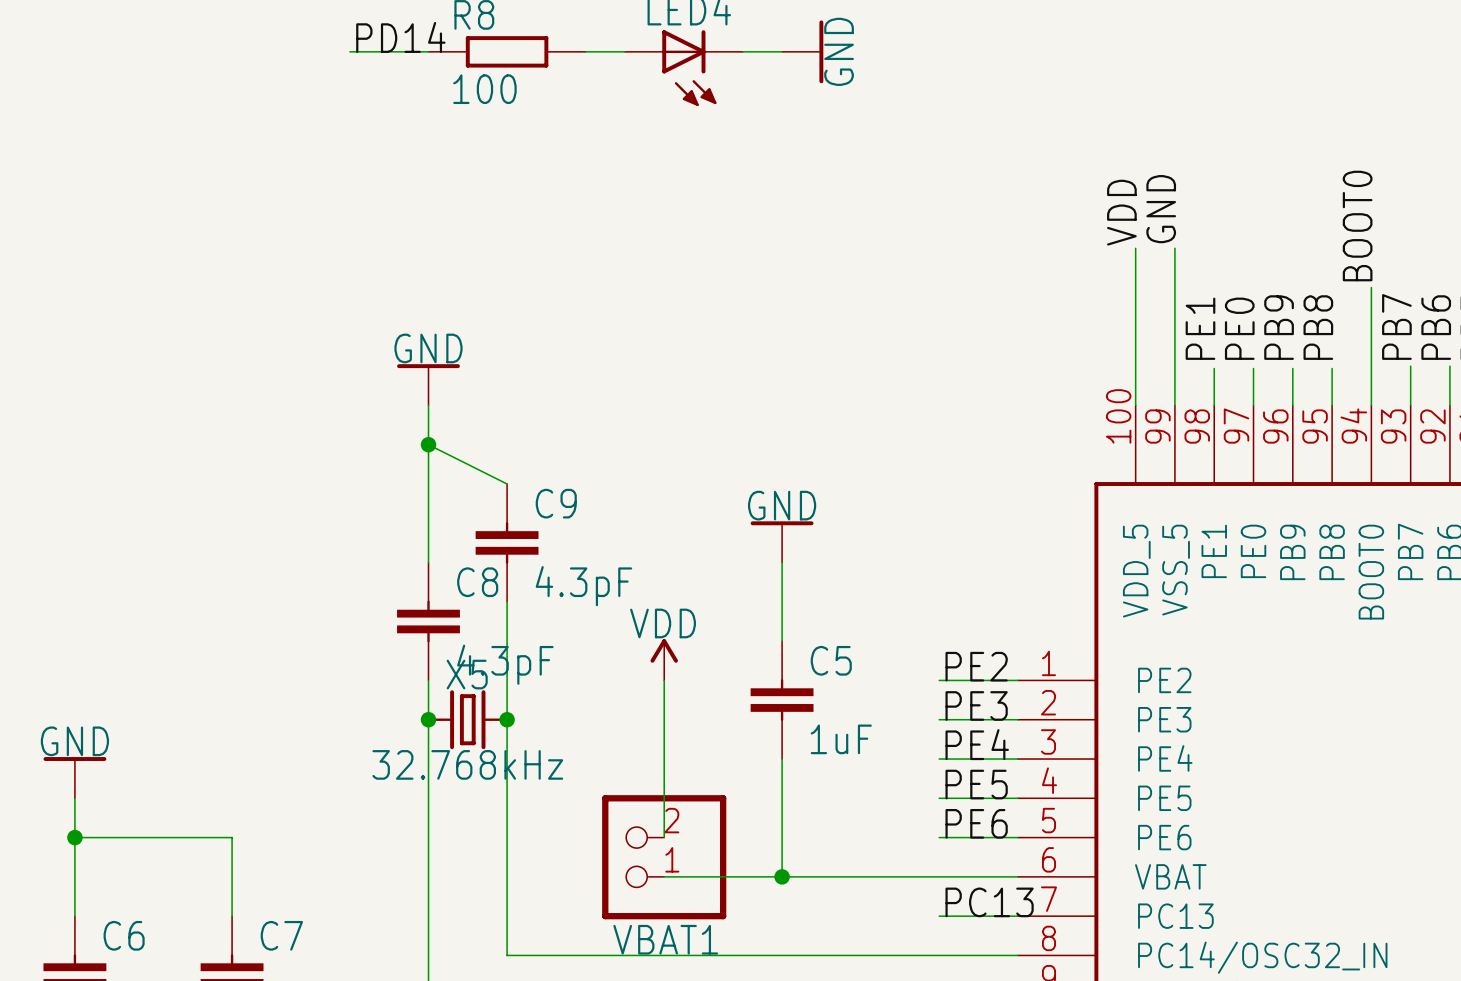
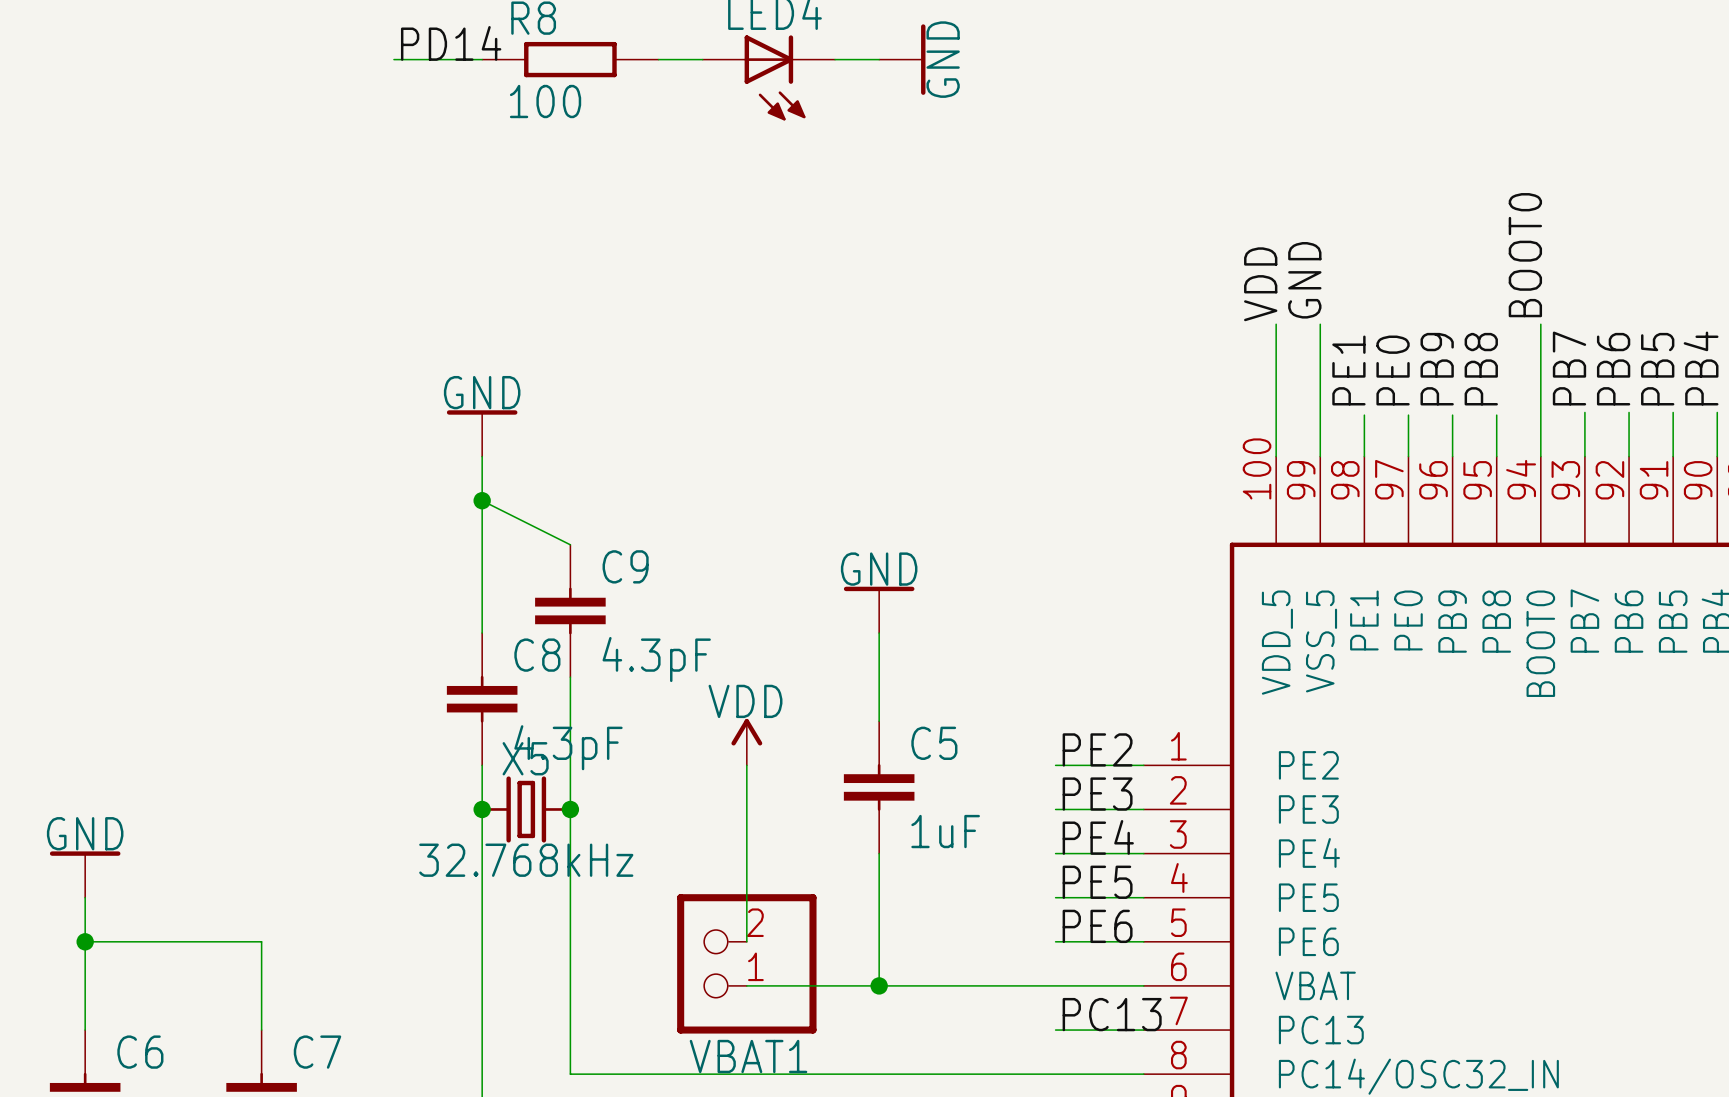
label position: GND (1161, 209) -> GND (1304, 280)
label position: VDD (1121, 212) -> VDD (1260, 284)
wire: (1135, 248) (1135, 287) -> none
wire: (1174, 248) (1174, 287) -> none

